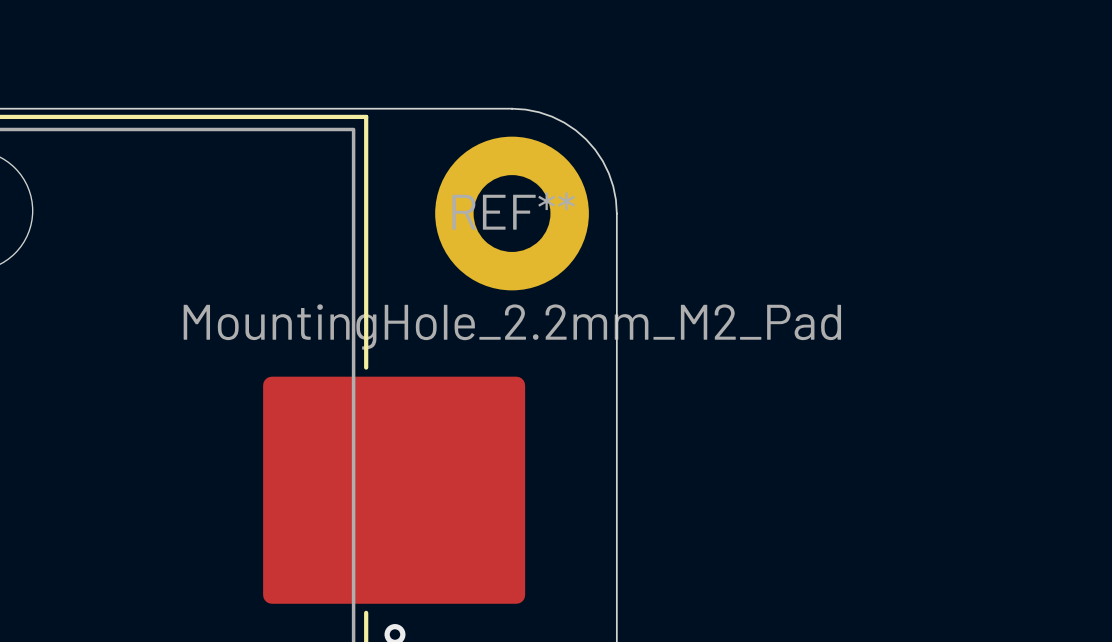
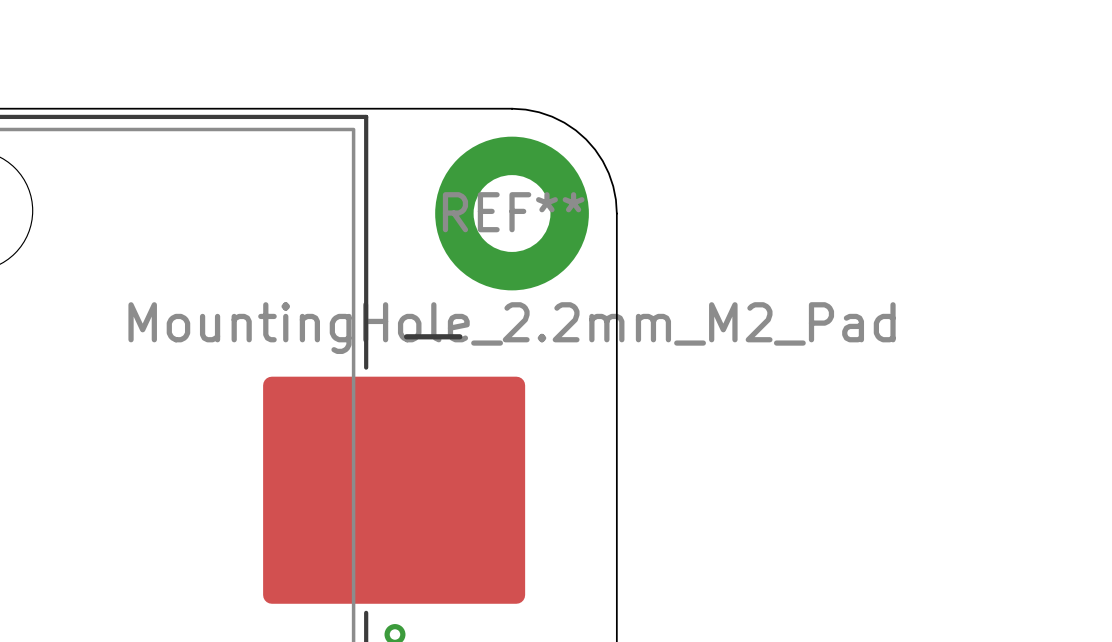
text: none -> - (433, 336)

